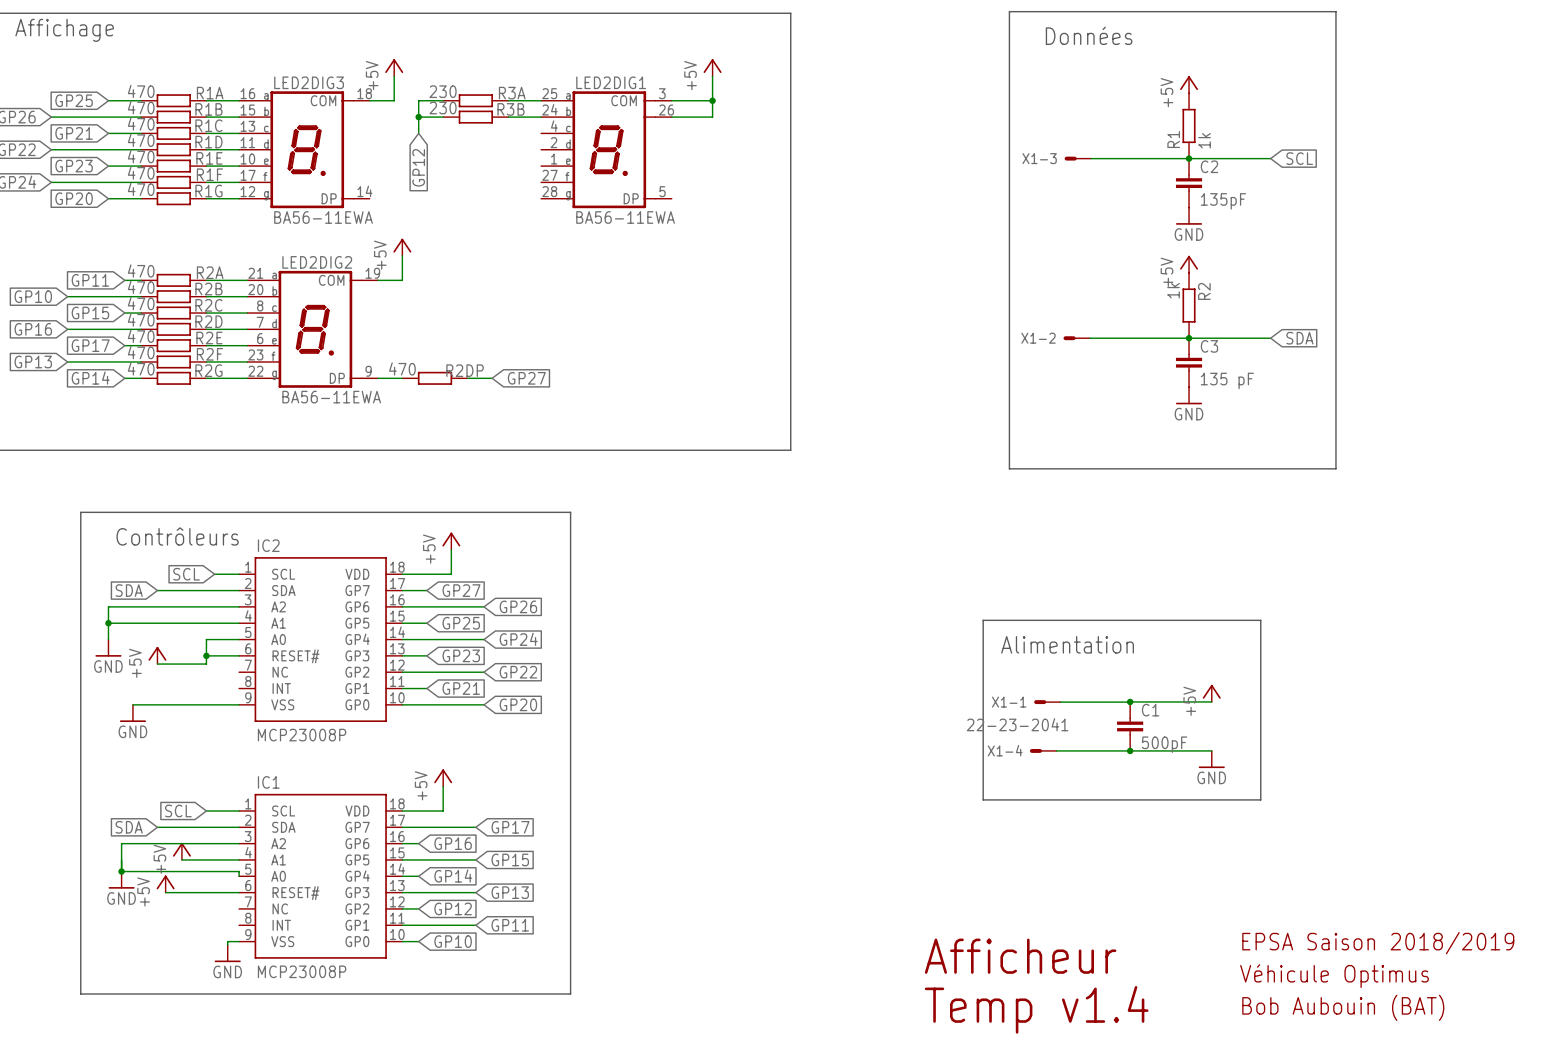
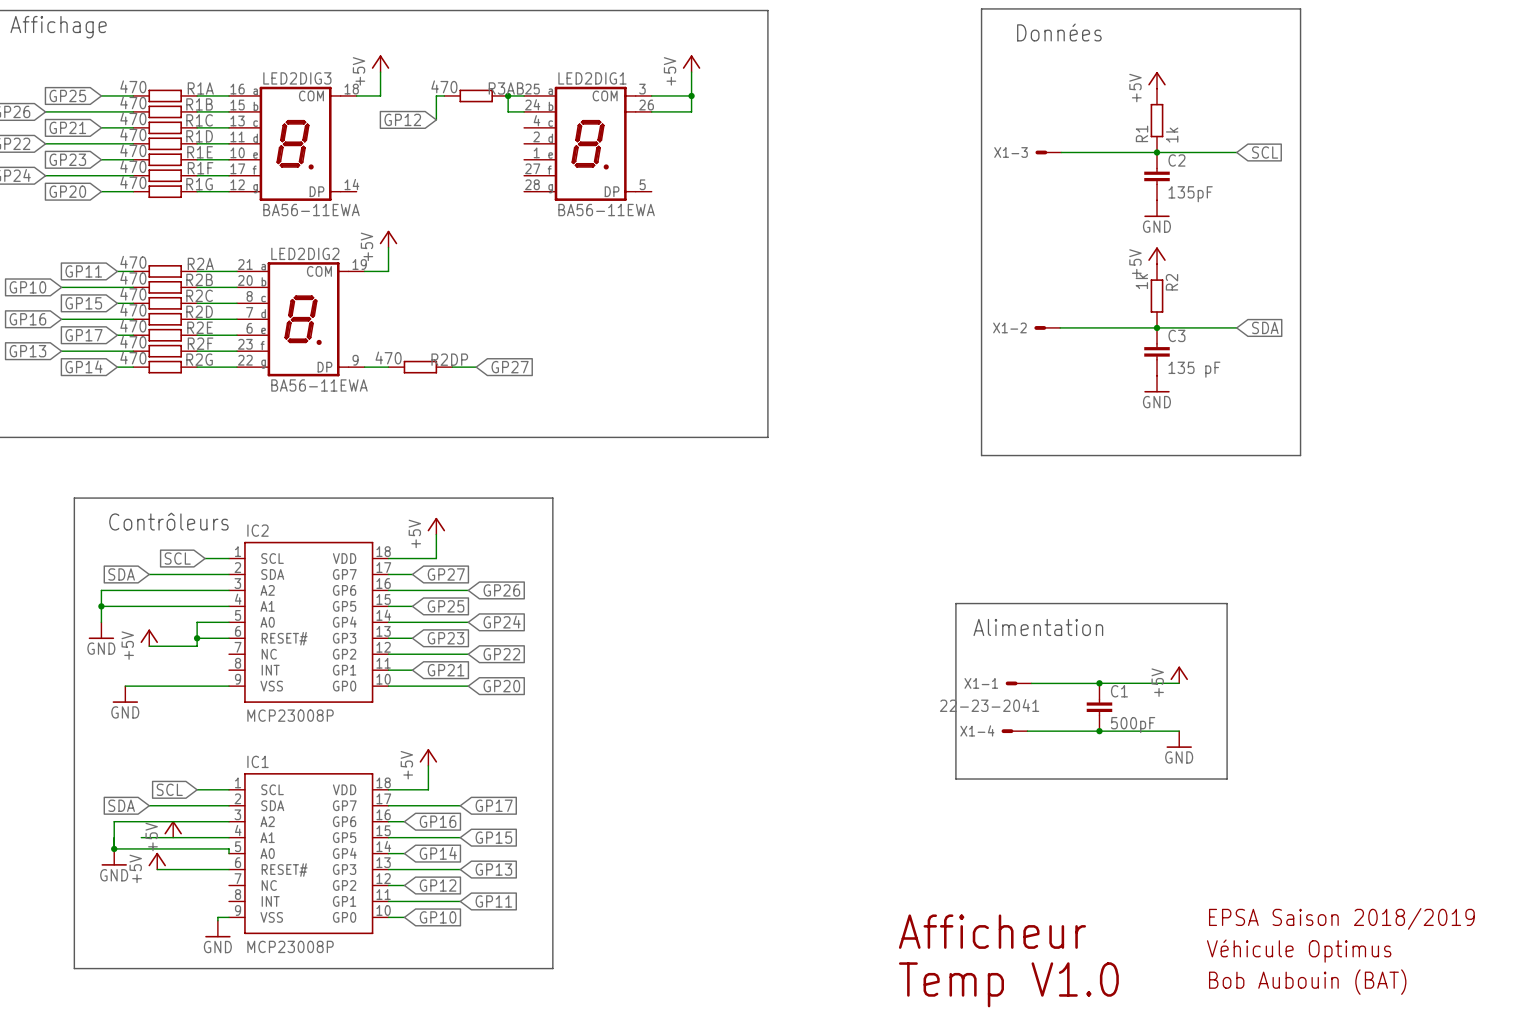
wire: (443, 100) (418, 100) (418, 133) -> none
wire: none -> (444, 95) (436, 95) (436, 119)
R3A: 230 (475, 100) -> none
R3AB: none -> 470 (476, 95)
junction: none -> (508, 95)
junction: (418, 117) -> none
R3B: 230 (475, 117) -> none
wire: (508, 117) (524, 117) -> none
global label rotation: 0° (418, 167) -> 90° clockwise (402, 119)
wire: none -> (141, 837) (173, 837)
text: Temp v1.4 (1036, 1009) -> Temp V1.0 (1008, 984)

